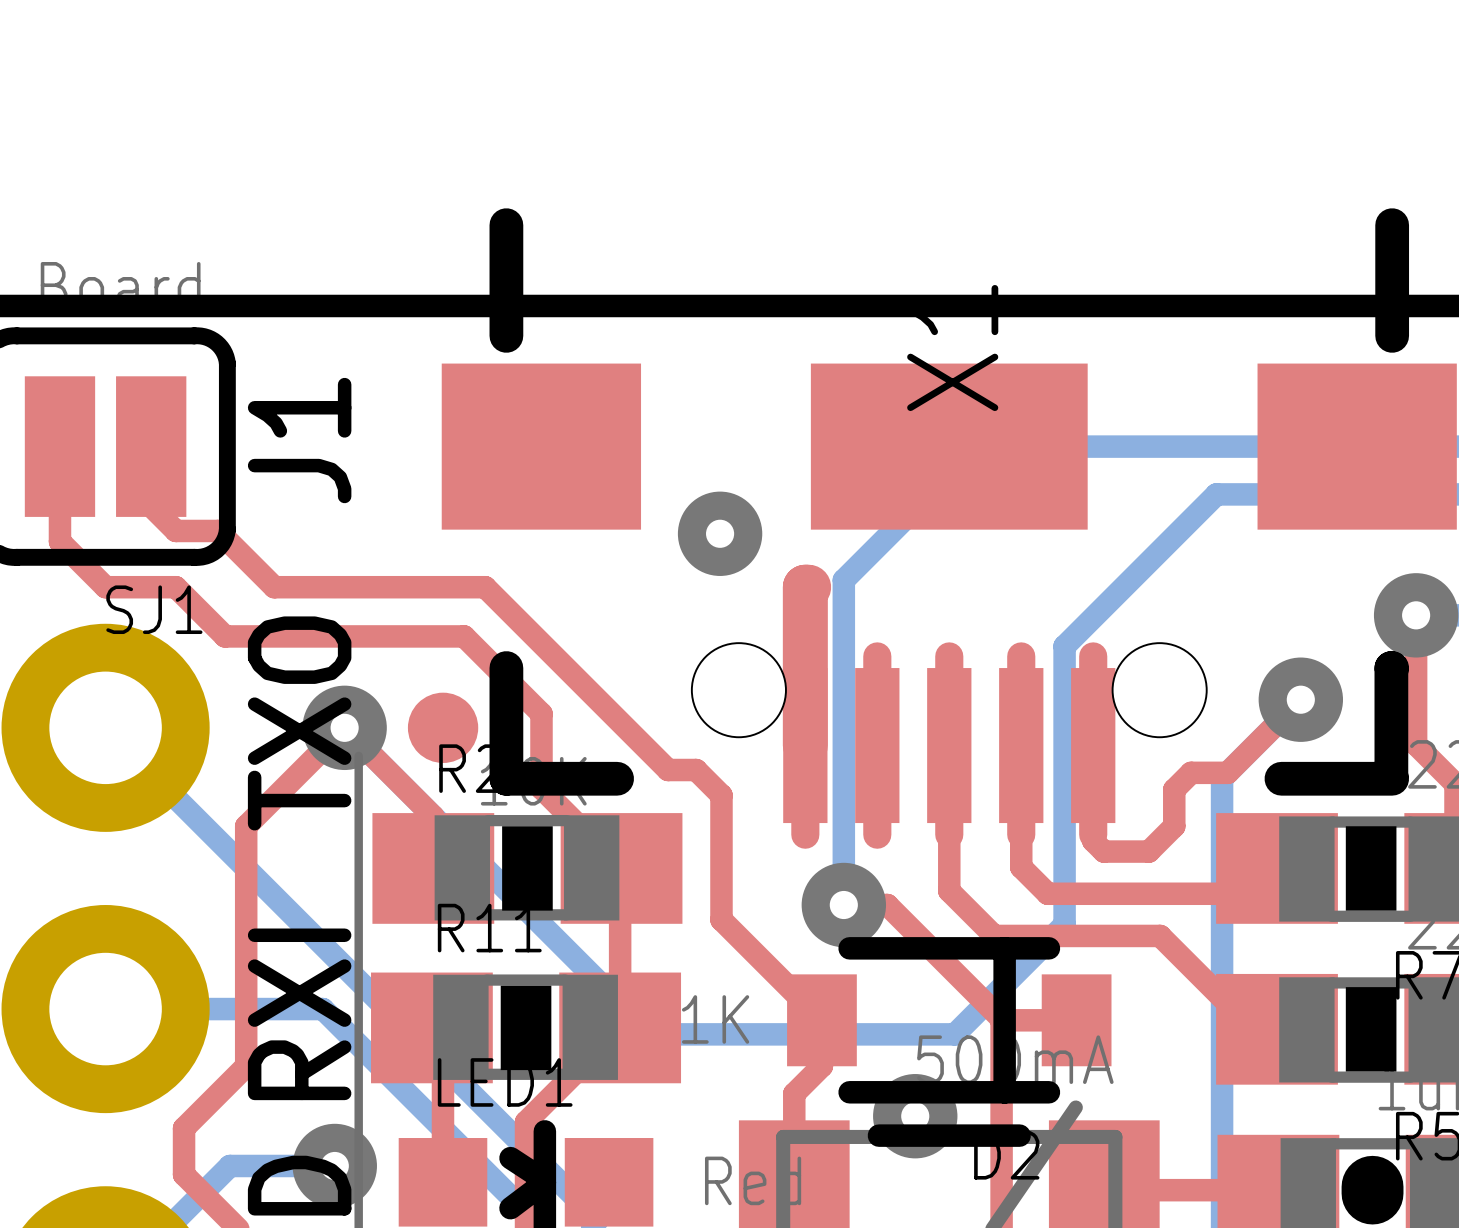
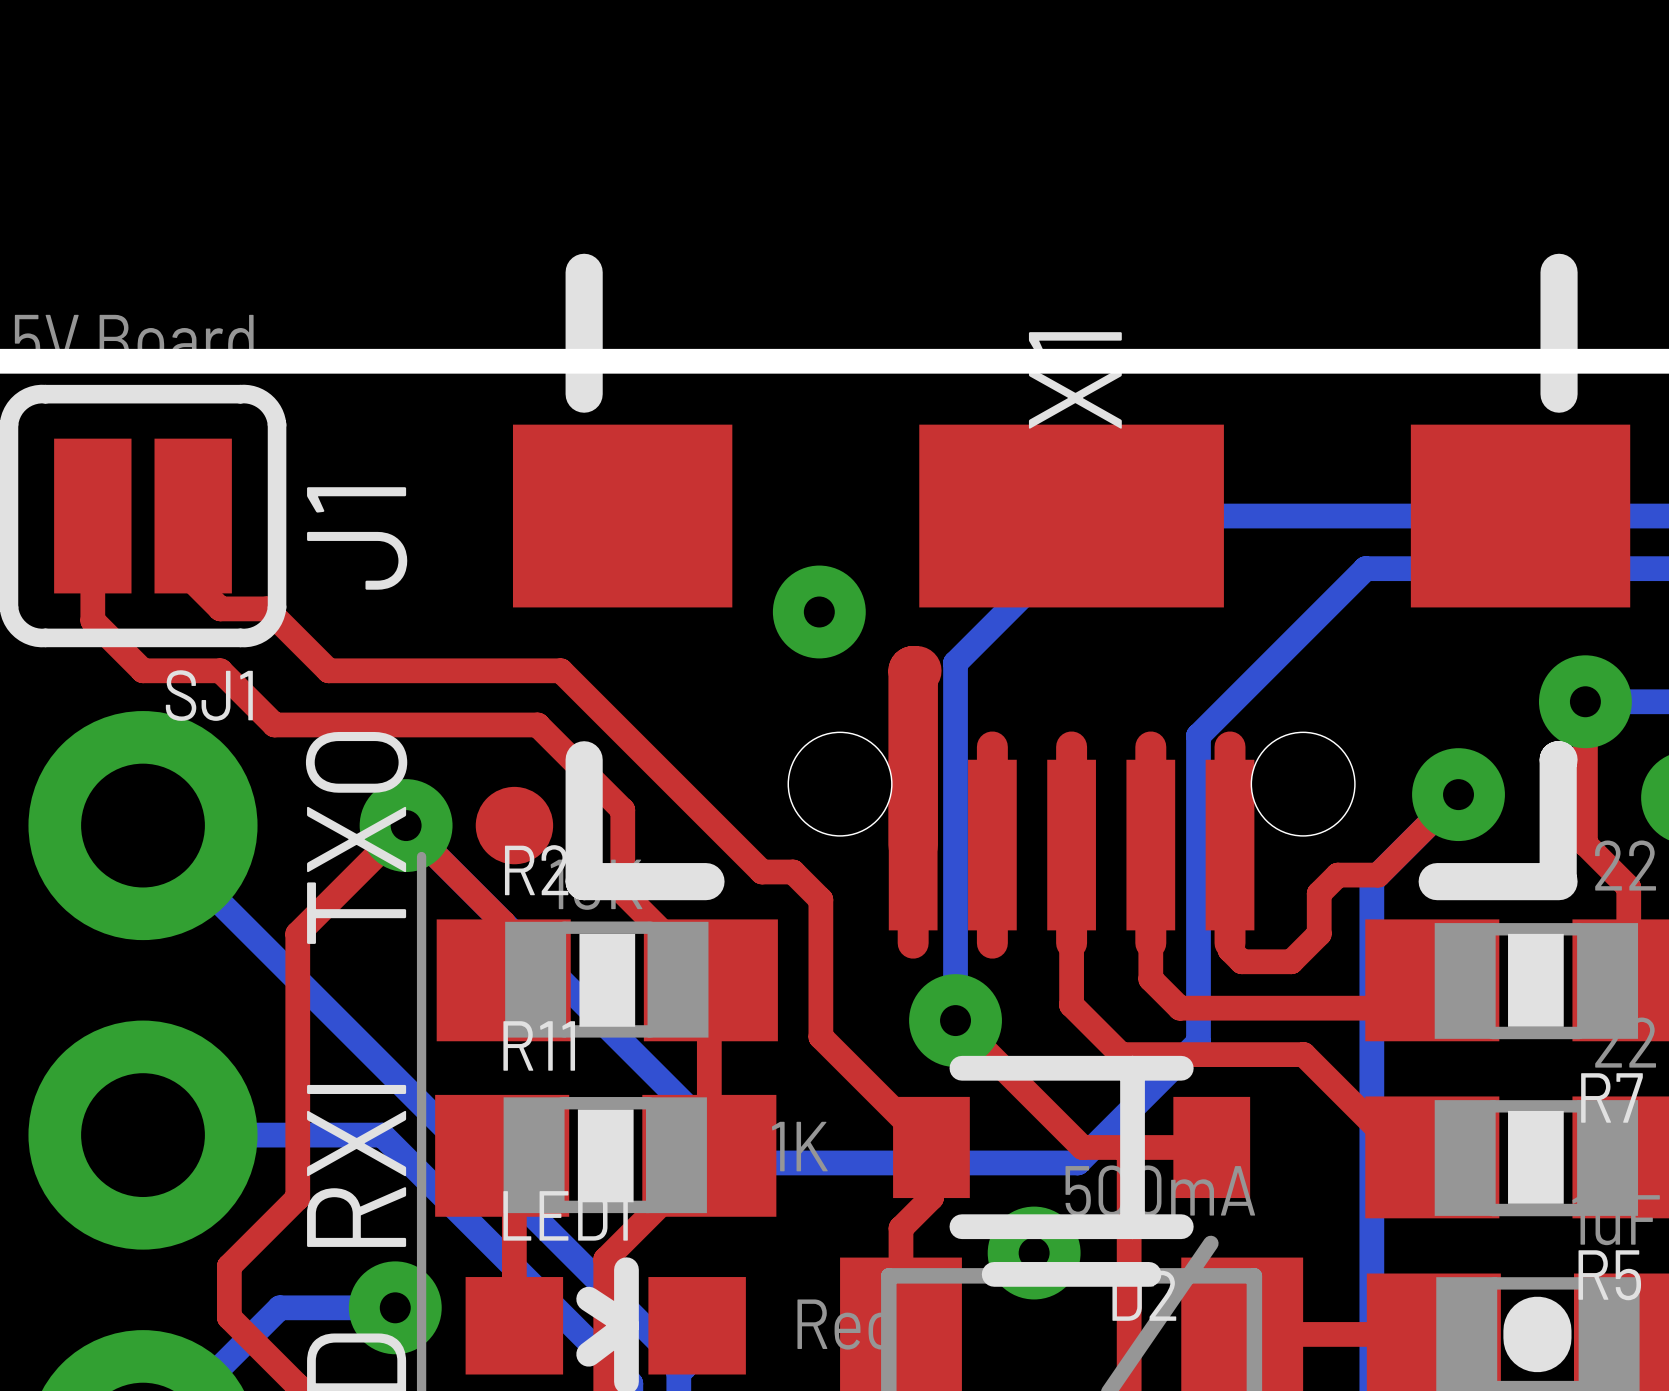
top track: (843, 905) (887, 905) (1002, 1020) -> (955, 1020) (1082, 1147) (1130, 1147)

